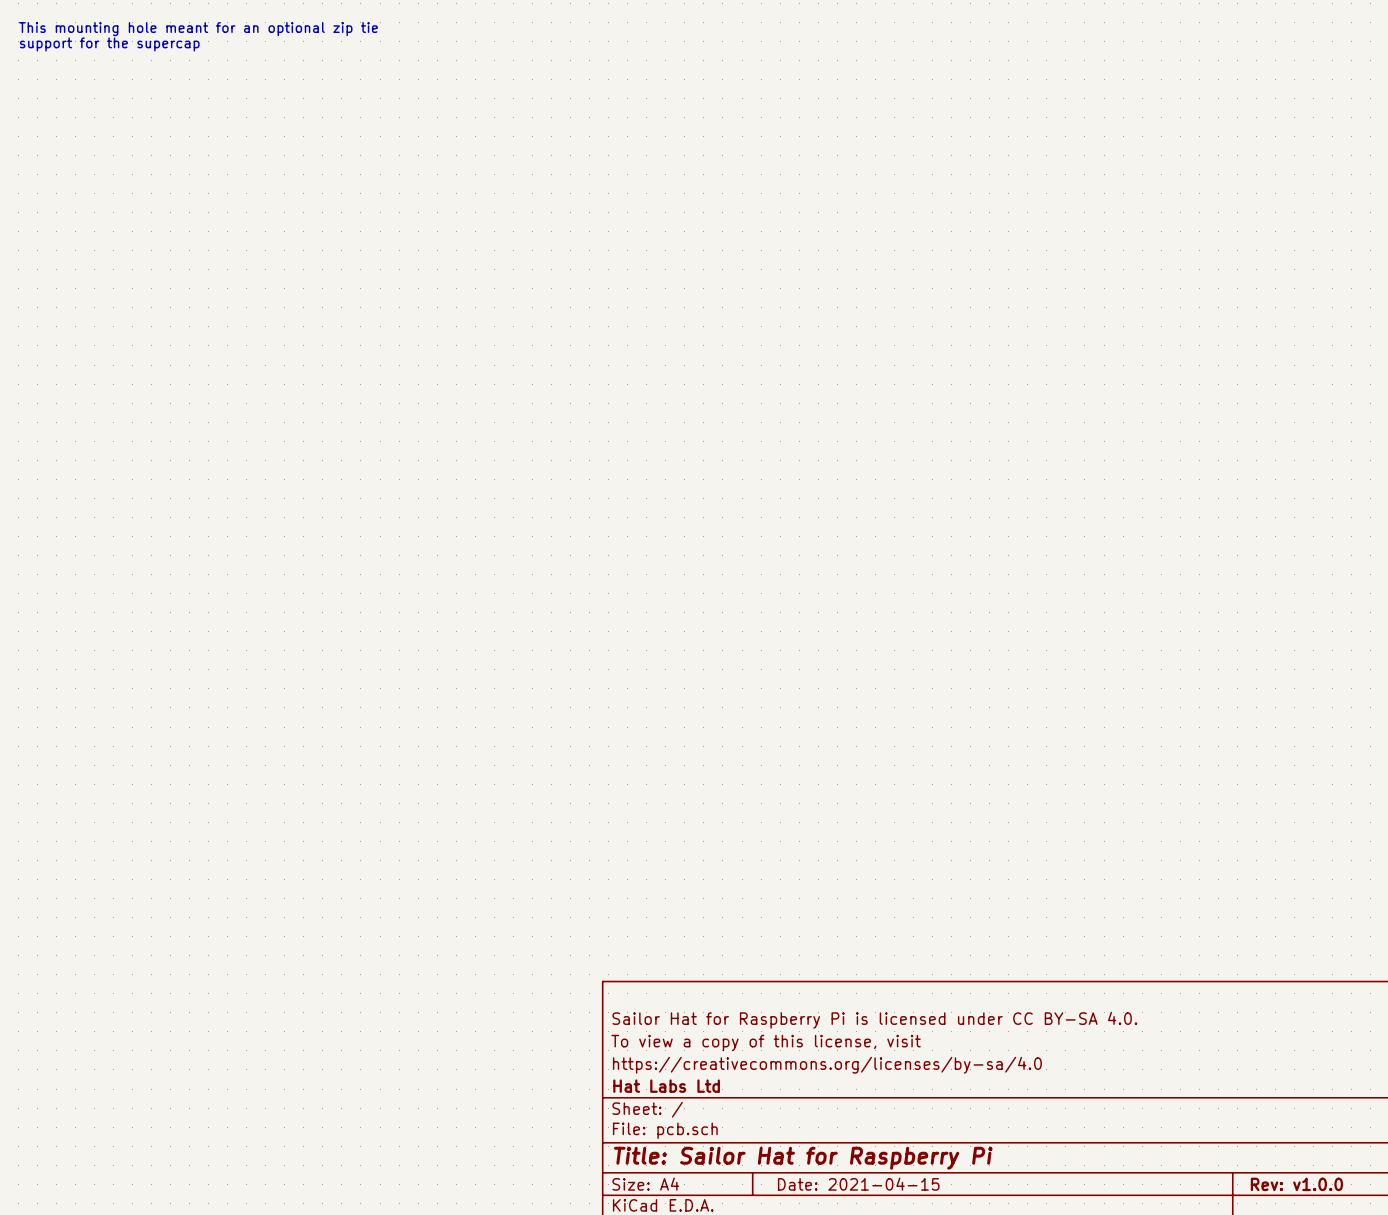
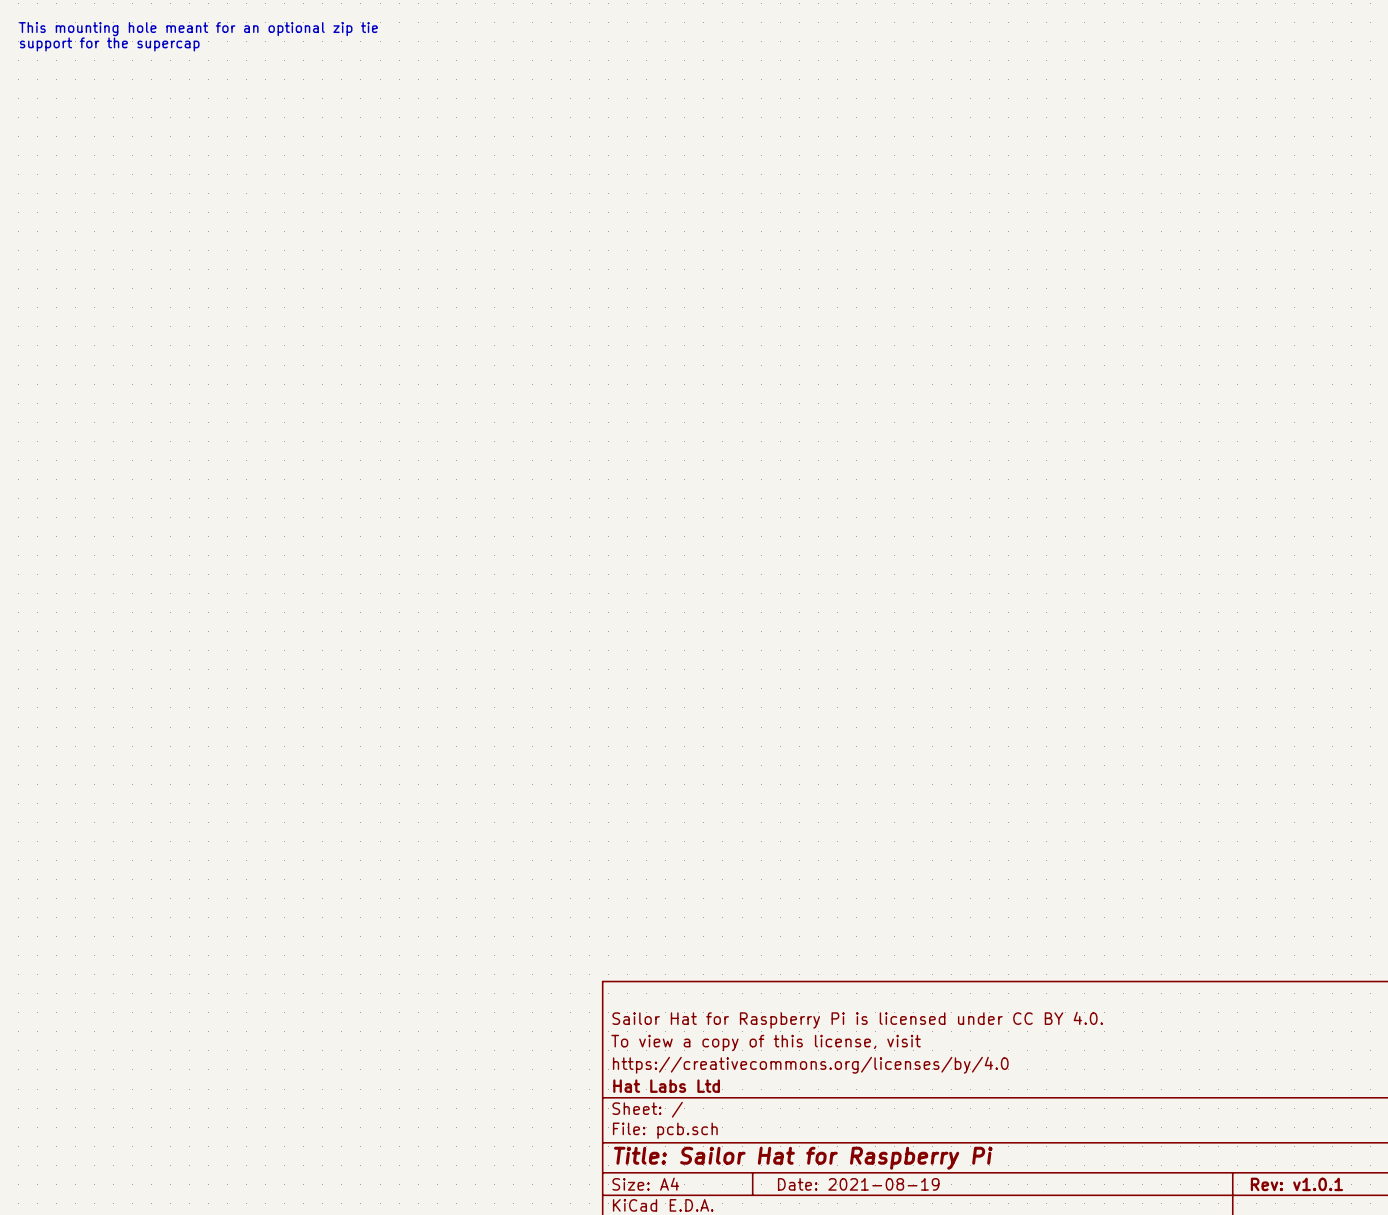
title block: Sailor Hat for Raspberry Pi is licensed under CC BY-SA 4.0. (874, 1020) -> Sailor Hat for Raspberry Pi is licensed under CC BY 4.0. (857, 1020)
title block: https://creativecommons.org/licenses/by-sa/4.0 (827, 1065) -> https://creativecommons.org/licenses/by/4.0 (810, 1065)
title block: Date: 2021-04-15 (858, 1184) -> Date: 2021-08-19 (858, 1184)
title block: Rev: v1.0.0 (1296, 1184) -> Rev: v1.0.1 (1296, 1184)

